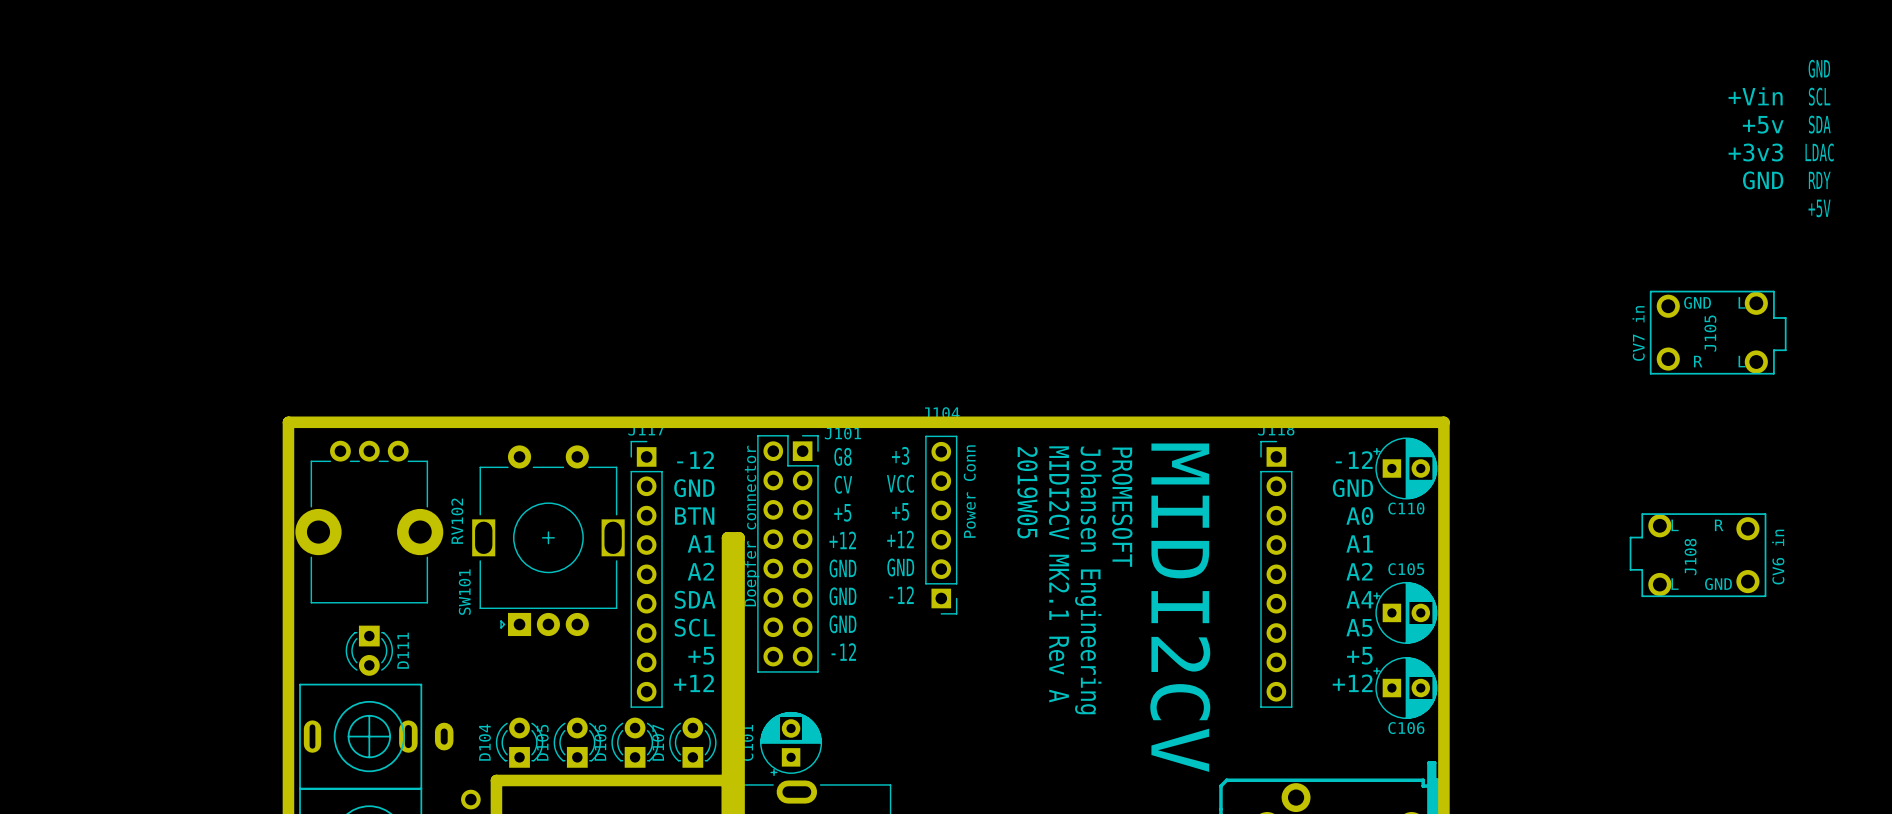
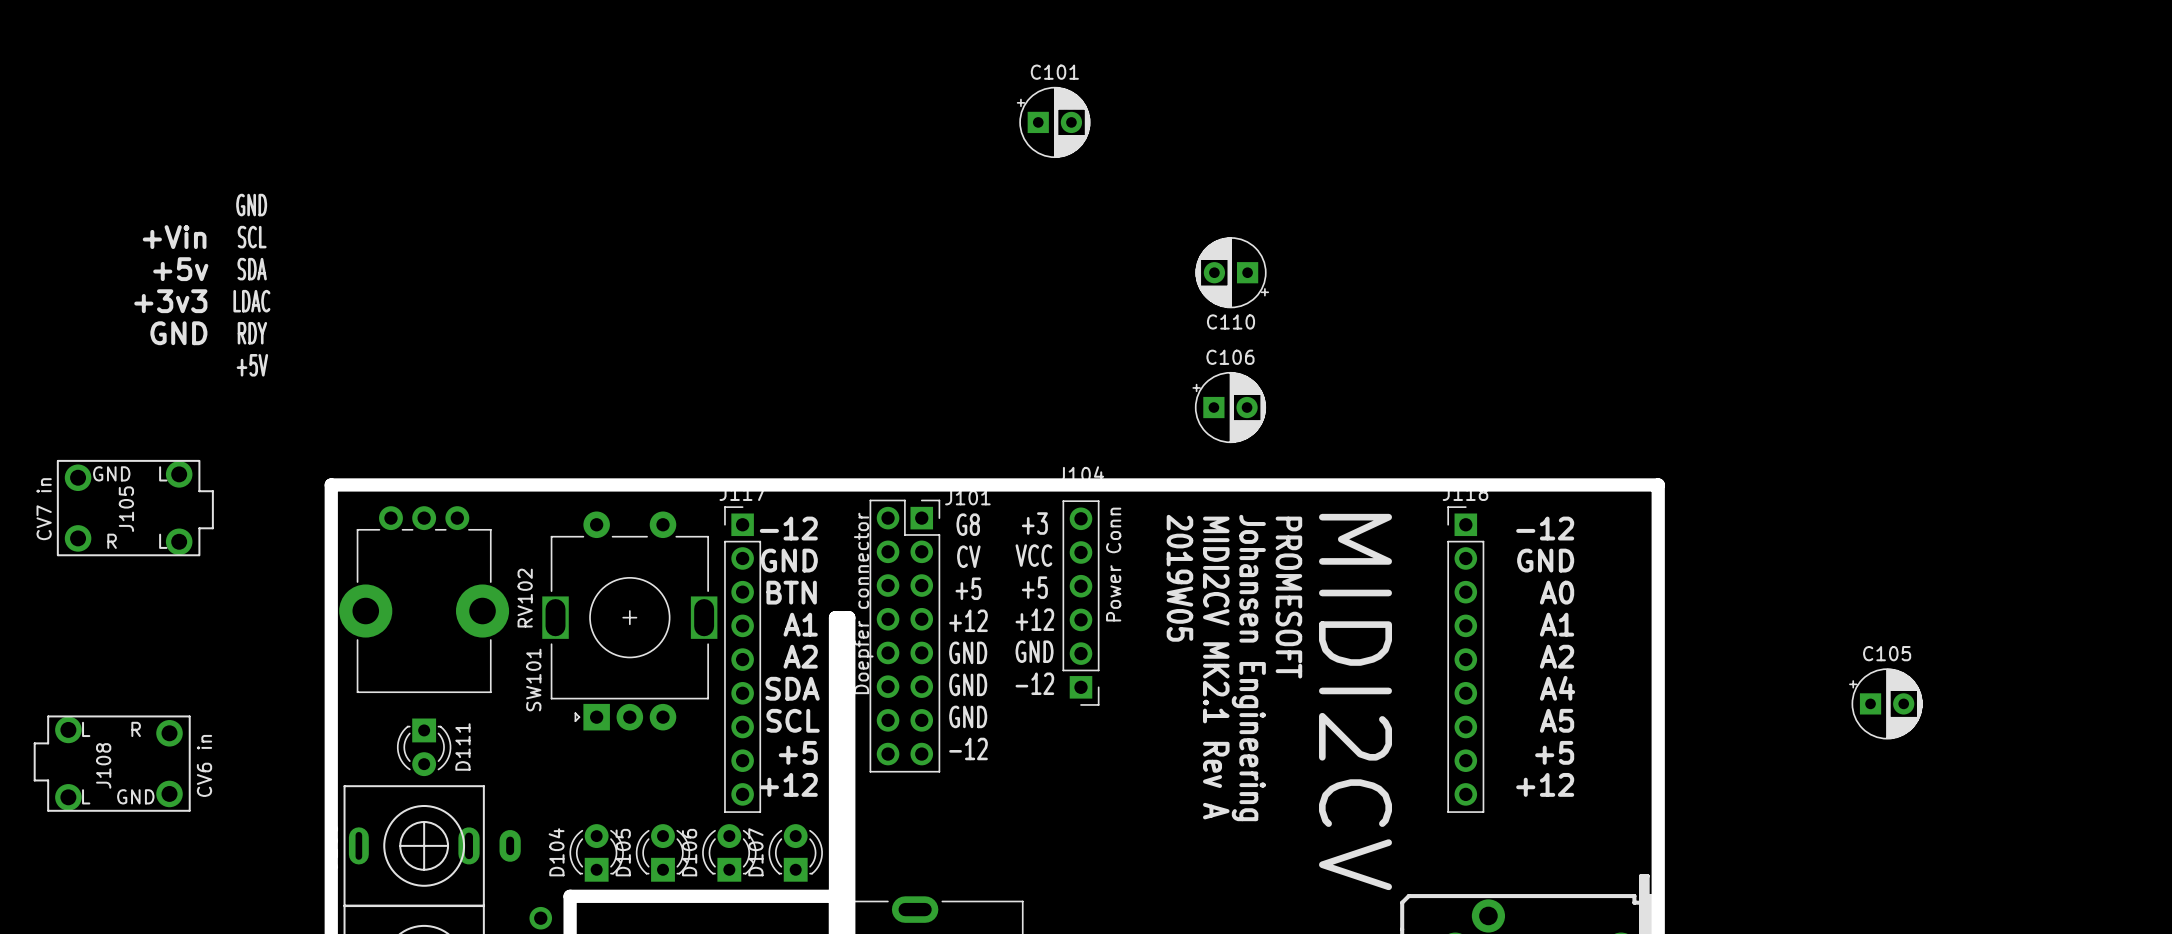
text: GND (1819, 68) -> none
text: +Vin (1755, 96) -> none
text: SCL (1819, 96) -> none
text: +5v (1763, 124) -> none
text: SDA (1819, 124) -> none
text: +3v3 (1755, 152) -> none
text: LDAC (1819, 152) -> none
text: none -> GND (251, 205)
text: GND (1763, 180) -> none
text: RDY (1819, 180) -> none
text: none -> +Vin (174, 237)
text: none -> SCL (252, 237)
text: +5V (1819, 208) -> none
text: none -> +5v (180, 269)
text: none -> SDA (252, 269)
text: none -> +3v3 (170, 301)
text: none -> LDAC (251, 301)
text: none -> GND (178, 333)
text: none -> RDY (252, 333)
text: none -> +5V (252, 365)
J105 position: (1718, 332) -> (135, 508)
C110 rotation: 0° (1405, 468) -> 180° (1232, 272)
C110 position: (1405, 468) -> (1232, 272)
J108 position: (1698, 555) -> (112, 763)
C105 position: (1405, 612) -> (1885, 703)
C106 position: (1405, 688) -> (1229, 407)
C106 name position: C106 (1406, 728) -> C106 (1230, 357)
C101 rotation: 0° (791, 743) -> 90° clockwise (1053, 122)
C101 position: (791, 743) -> (1053, 122)

